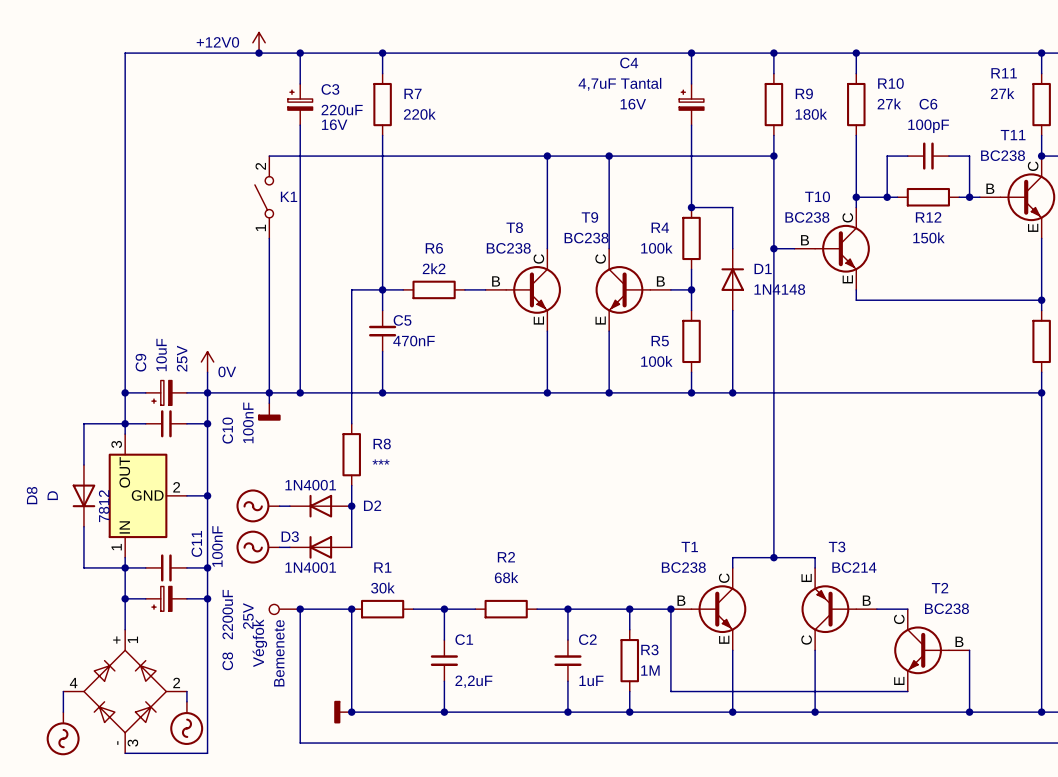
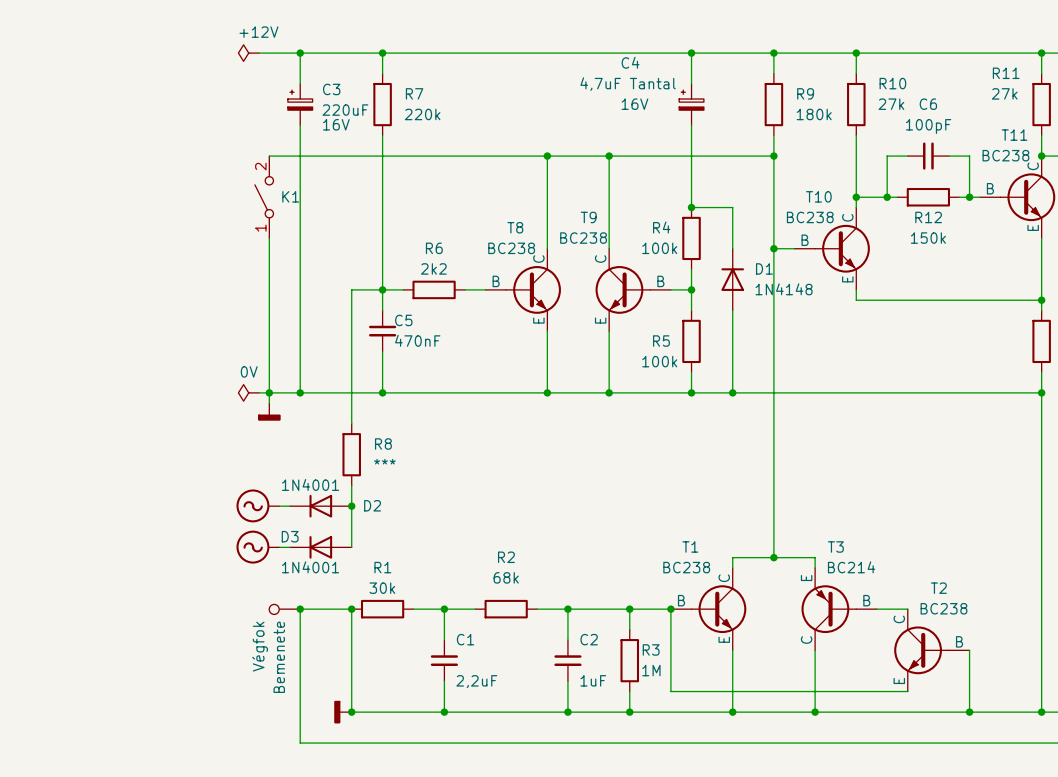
power symbol: +12V0 (259, 42) -> none
power symbol: none -> +12V (248, 53)
wire: (259, 53) (125, 53) (125, 434) -> none
junction: (259, 53) -> none
power symbol: 0V (207, 362) -> none
wire: (207, 372) (207, 753) (125, 753) -> none
wire: (125, 392) (145, 392) -> none
junction: (125, 392) -> none
C9: 10uF (166, 392) -> none
wire: (186, 392) (259, 392) -> none
junction: (207, 392) -> none
power symbol: none -> 0V (248, 392)
junction: (125, 423) -> none
wire: (145, 423) (83, 423) (83, 464) -> none
C10: 100nF (166, 423) -> none
wire: (186, 423) (207, 423) -> none
junction: (207, 423) -> none
D8: D (83, 495) -> none
part: 7812 (147, 495) -> none
wire: (186, 495) (207, 495) -> none
junction: (207, 495) -> none
wire: (83, 526) (83, 567) (145, 567) -> none
wire: (125, 557) (125, 629) -> none
junction: (125, 567) -> none
C11: 100nF (166, 567) -> none
wire: (186, 567) (207, 567) -> none
junction: (207, 567) -> none
wire: (125, 598) (145, 598) -> none
junction: (125, 598) -> none
C8: 2200uF (166, 598) -> none
wire: (186, 598) (207, 598) -> none
junction: (207, 598) -> none
wire: (63, 691) (63, 712) -> none
part: (125, 691) -> none
wire: (186, 691) (186, 701) -> none
power symbol: (186, 723) -> none
power symbol: (63, 733) -> none

